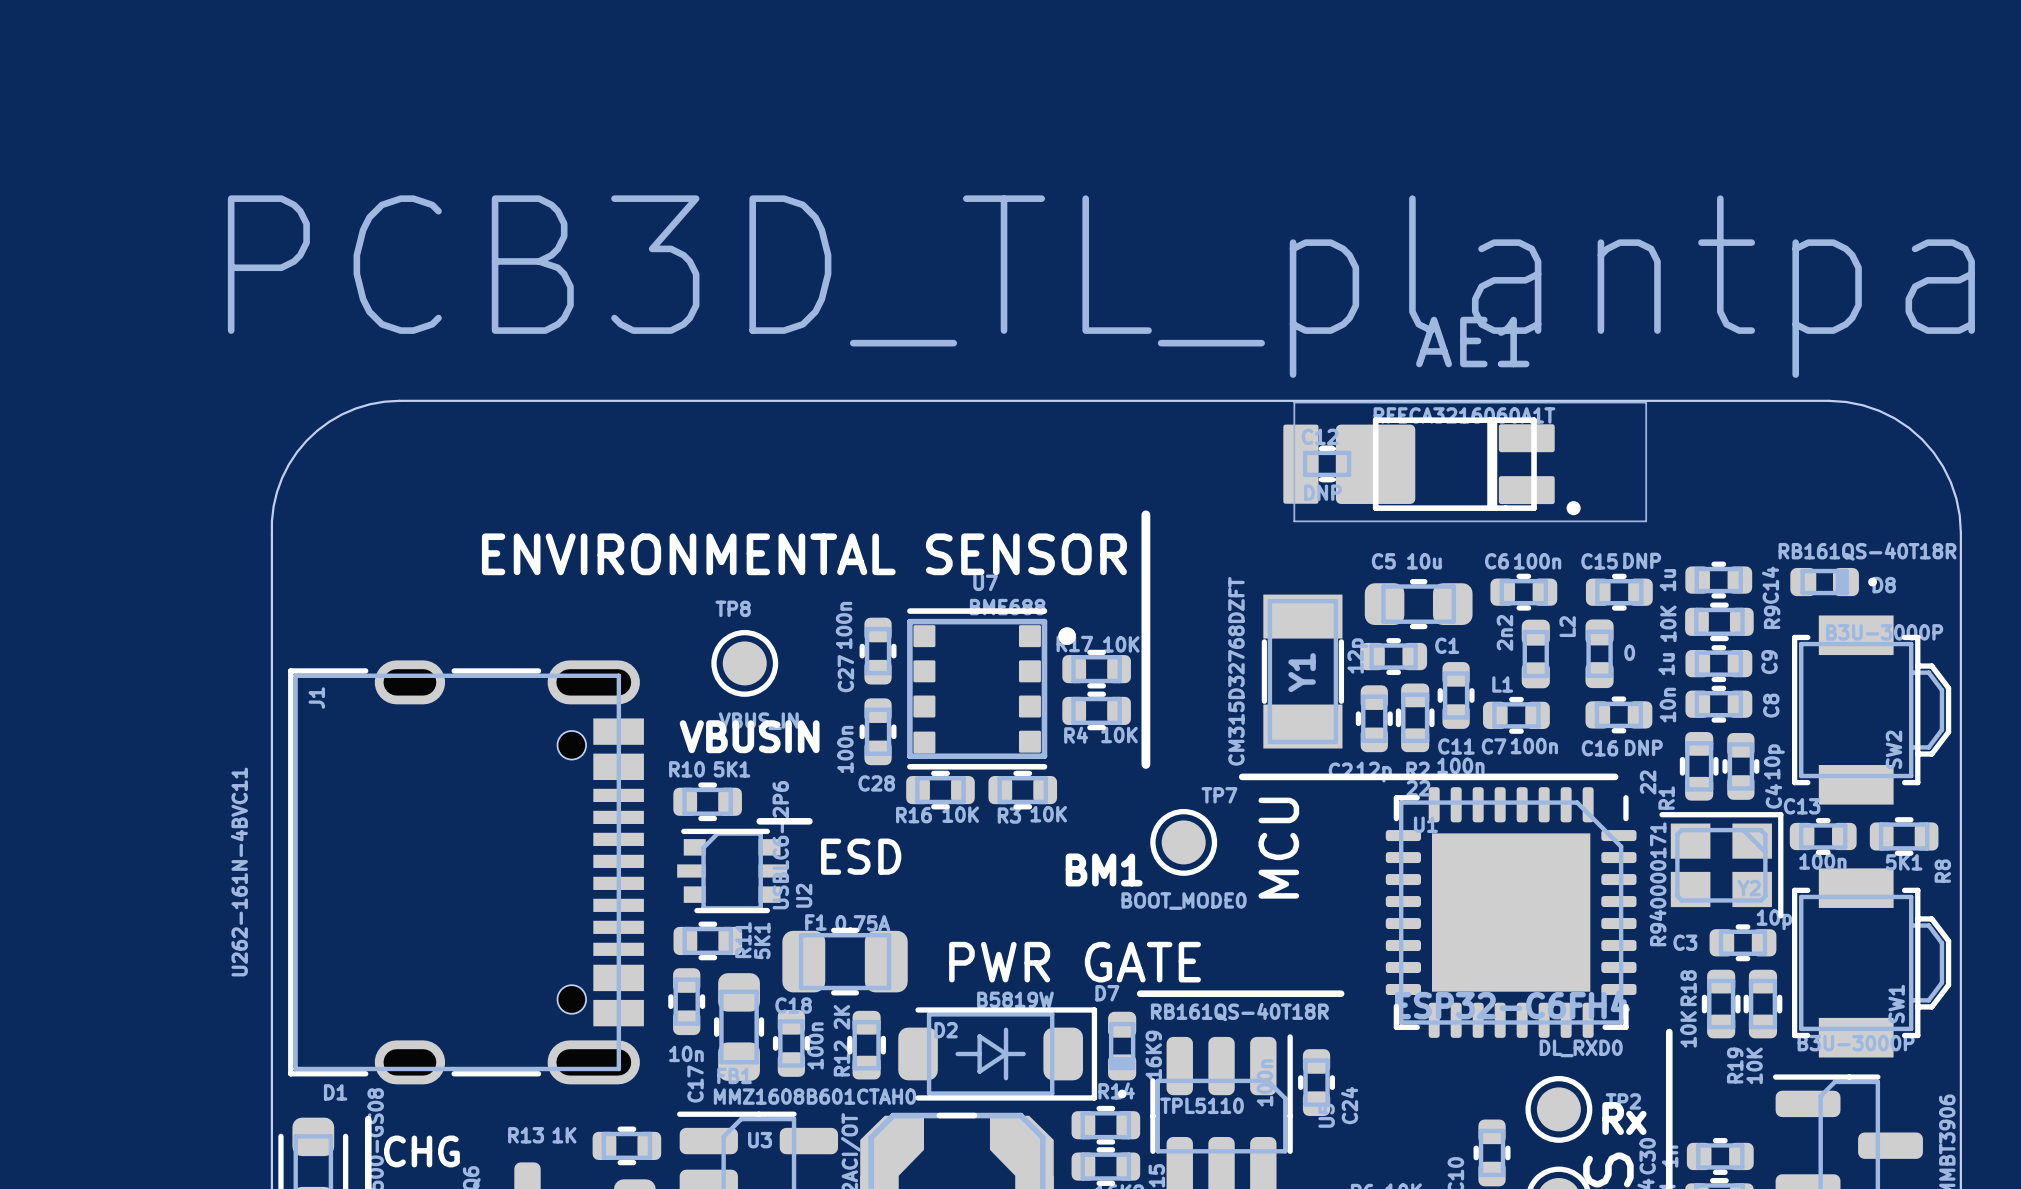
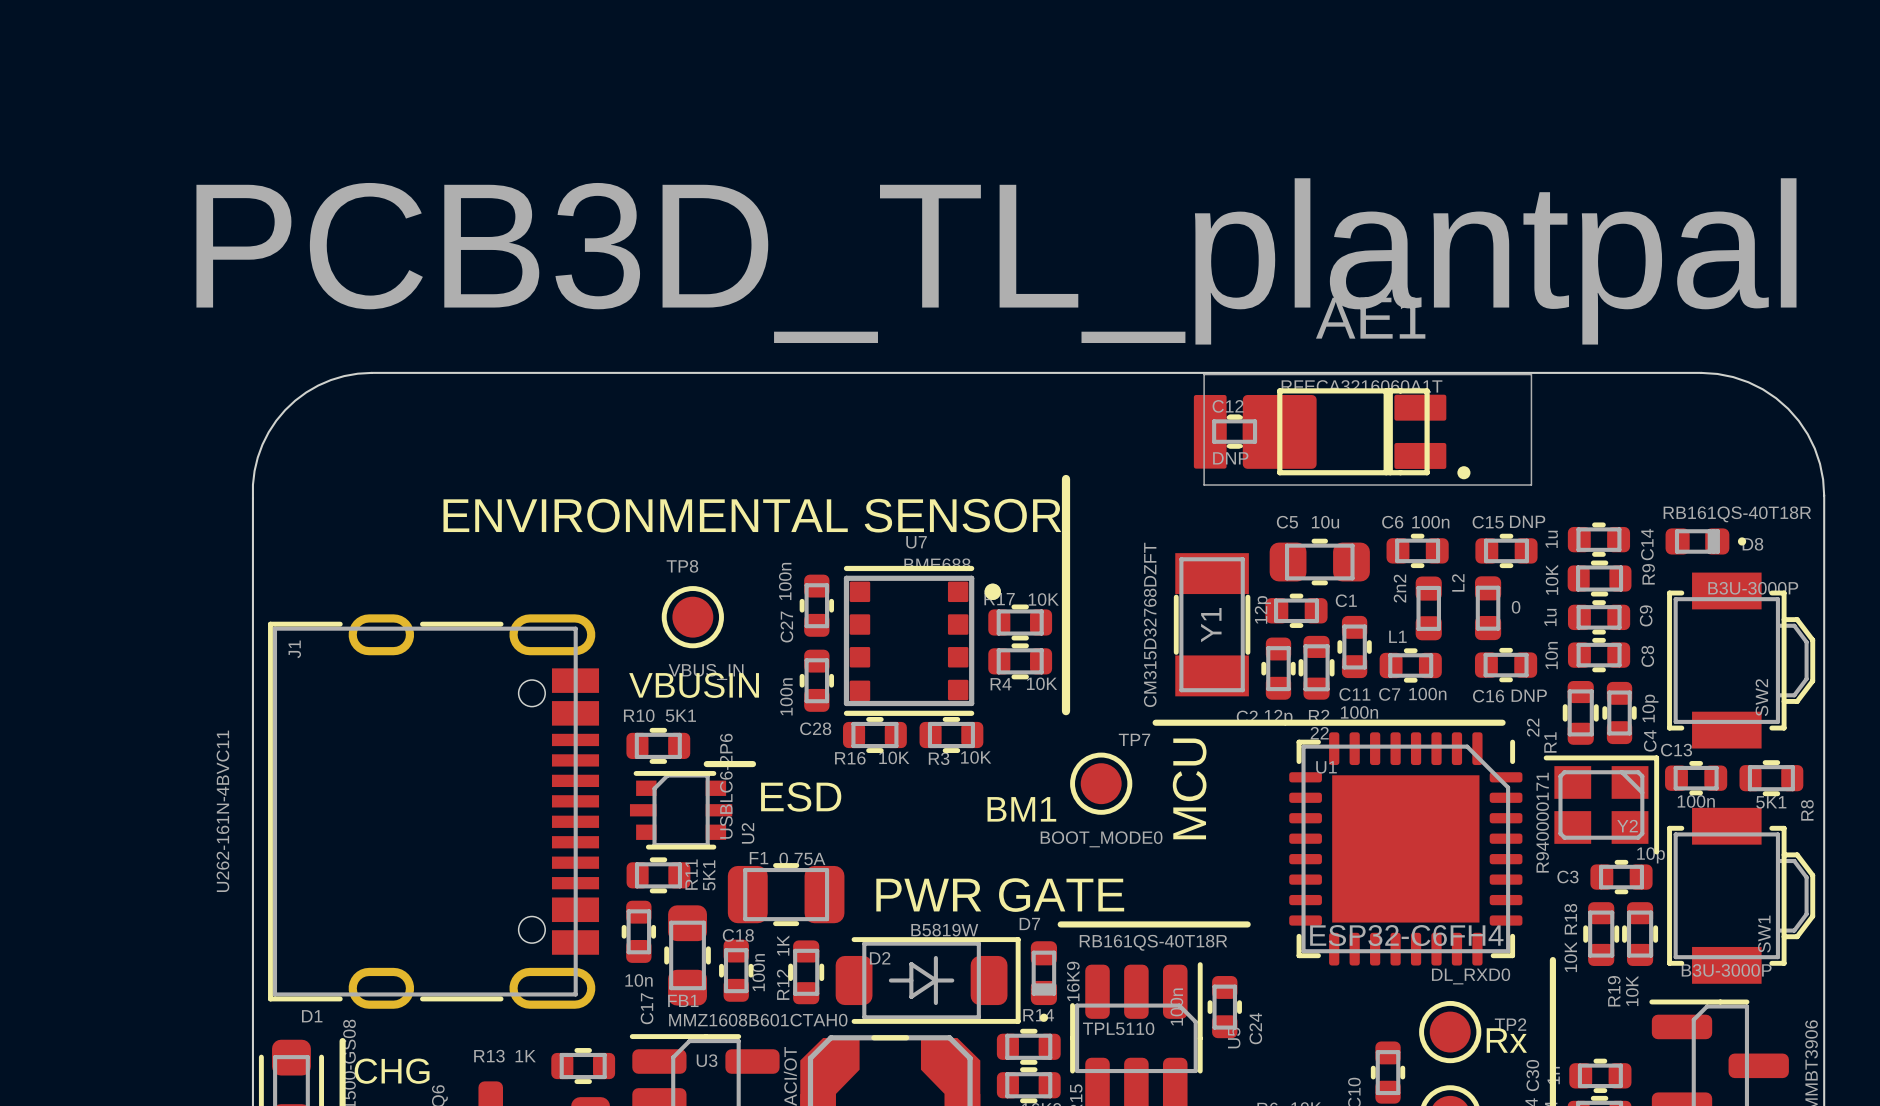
R12 value: 2K (841, 1017) -> 1K (783, 945)

